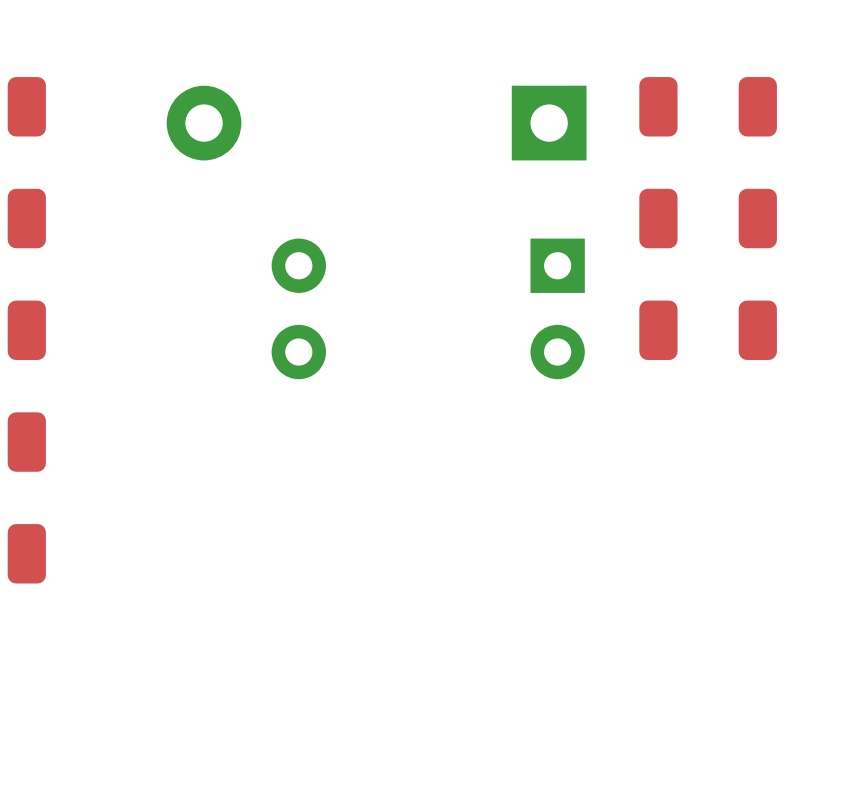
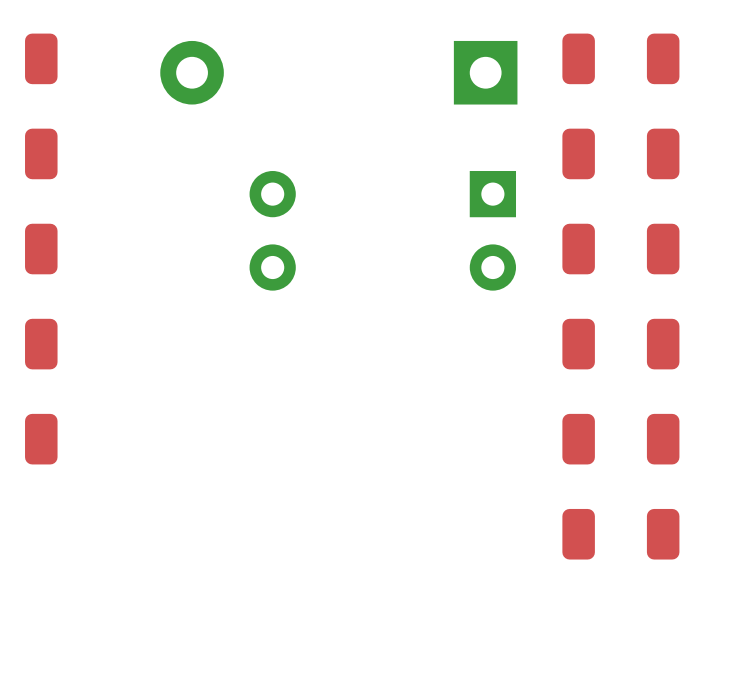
part: none -> (620, 344)
part: none -> (620, 439)
part: none -> (620, 534)

